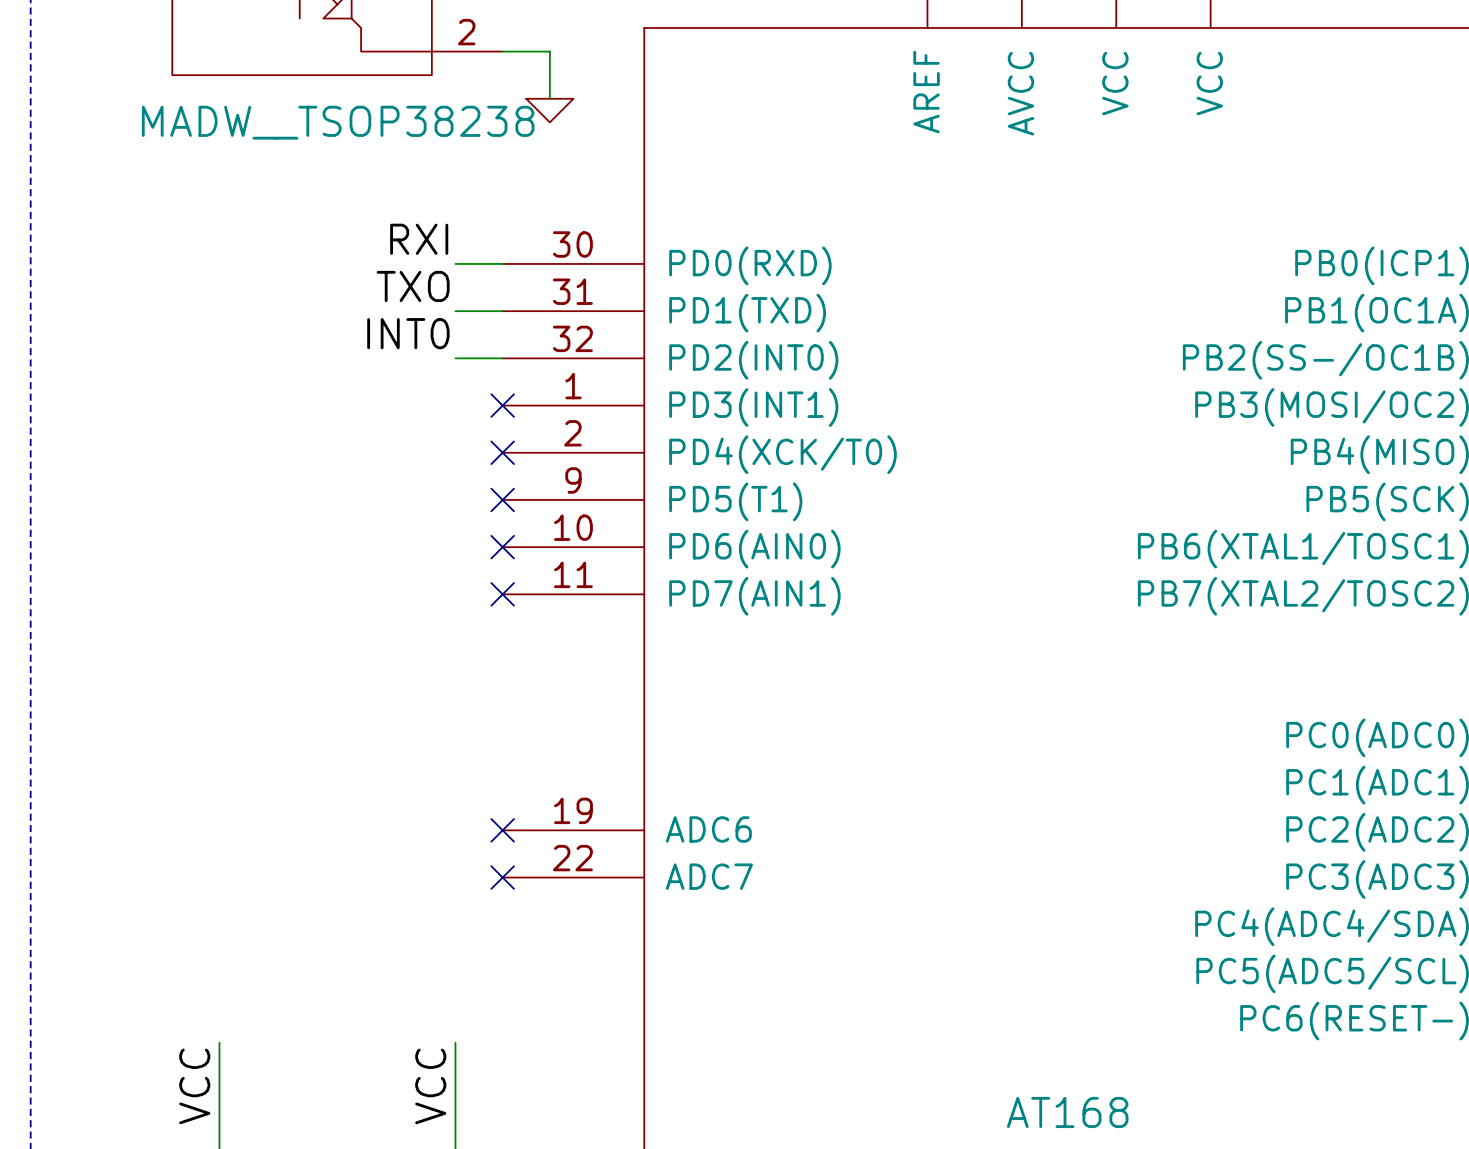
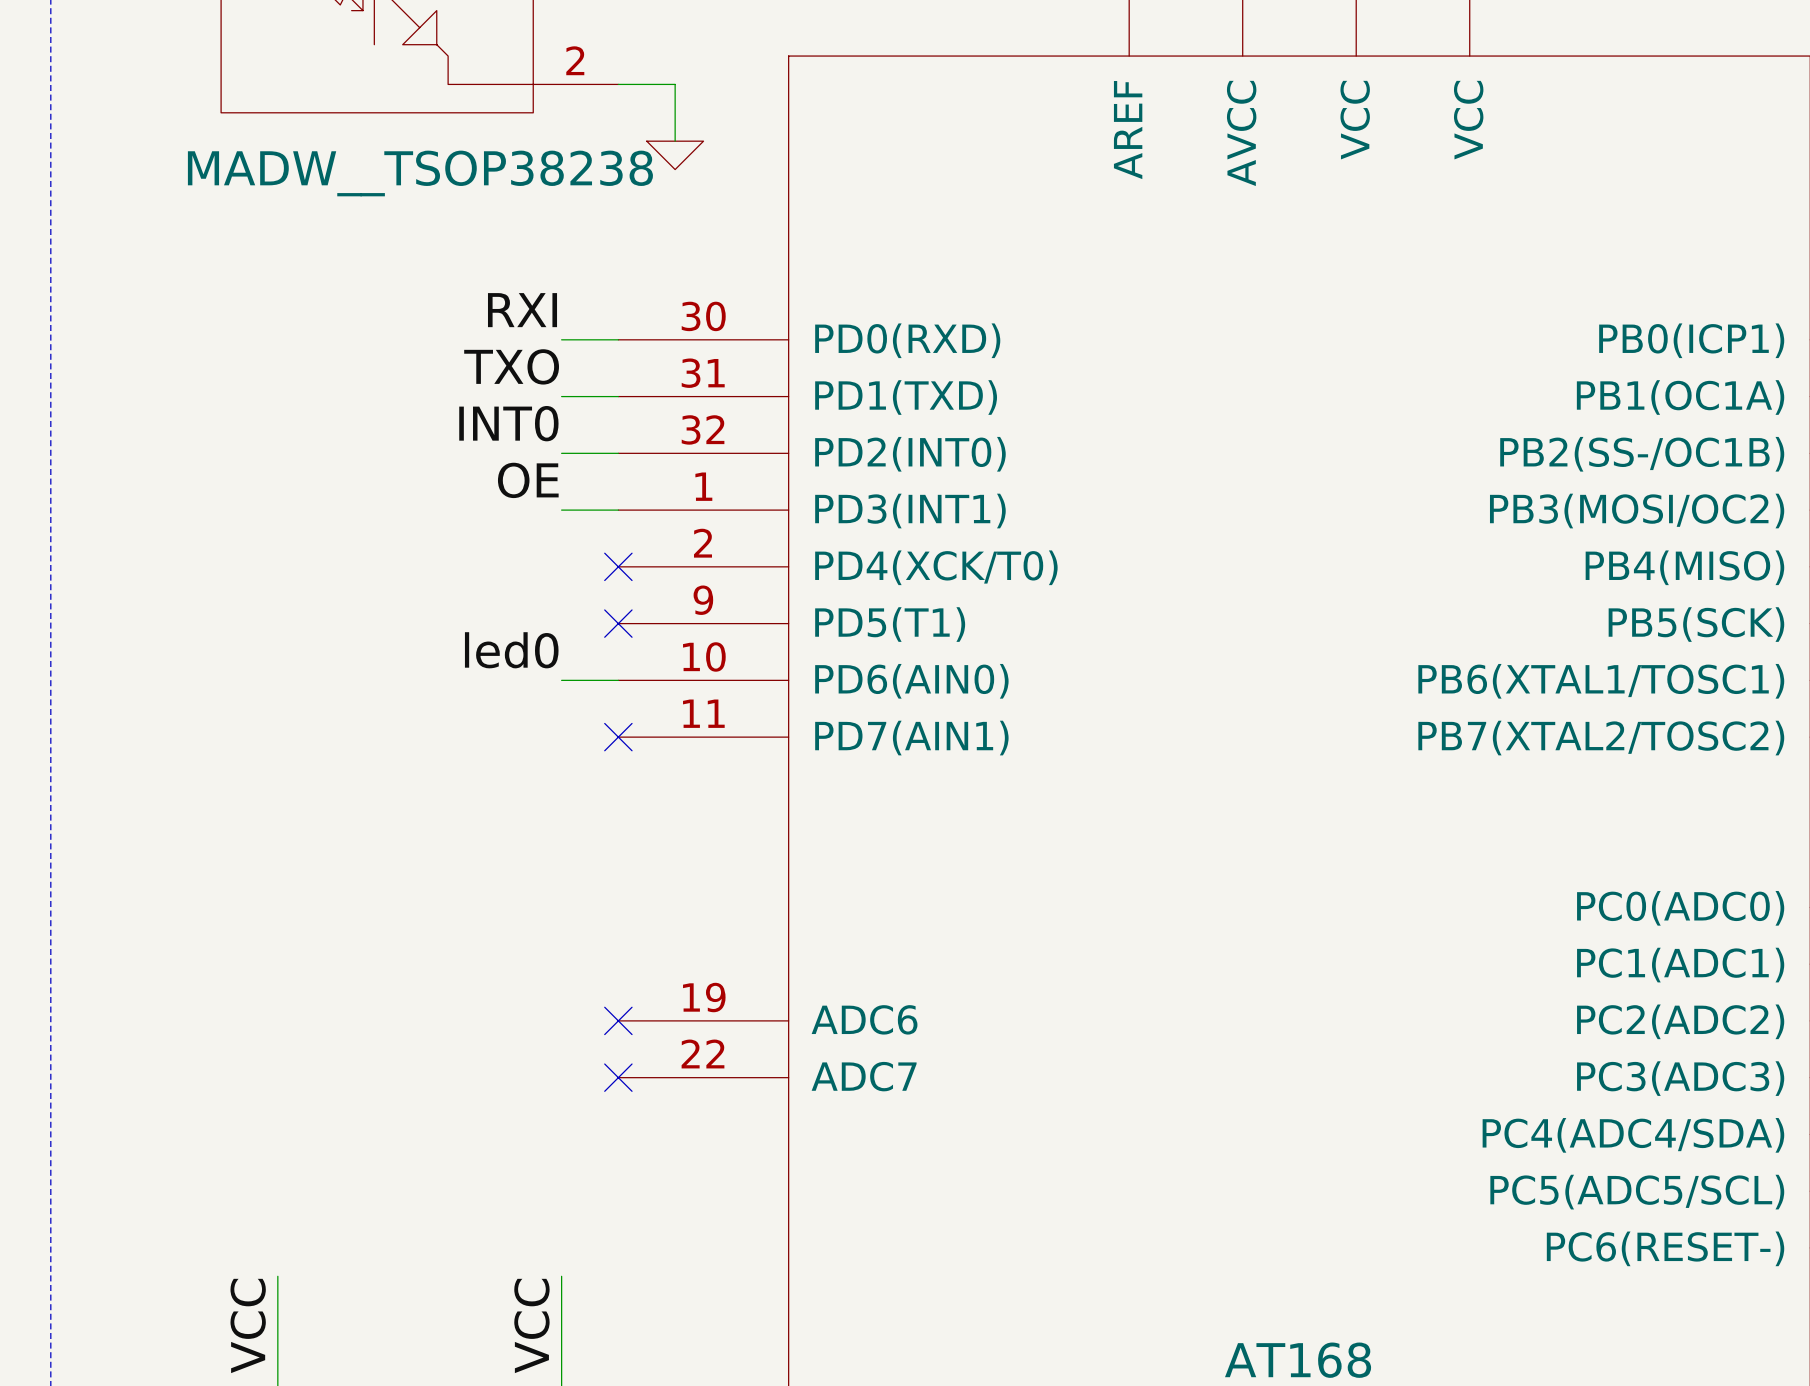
label: none -> OE (528, 480)
wire: none -> (561, 510) (618, 510)
no-connect mark: (502, 405) -> none
label: none -> led0 (511, 650)
wire: none -> (561, 680) (618, 680)
no-connect mark: (502, 547) -> none

